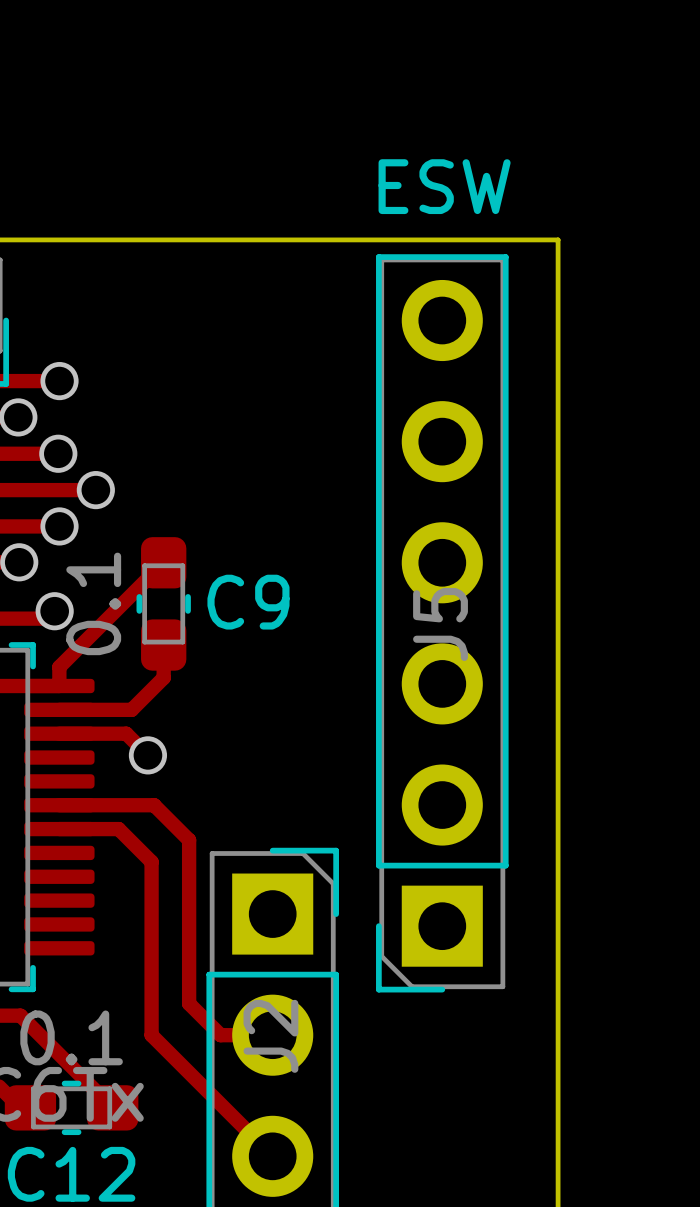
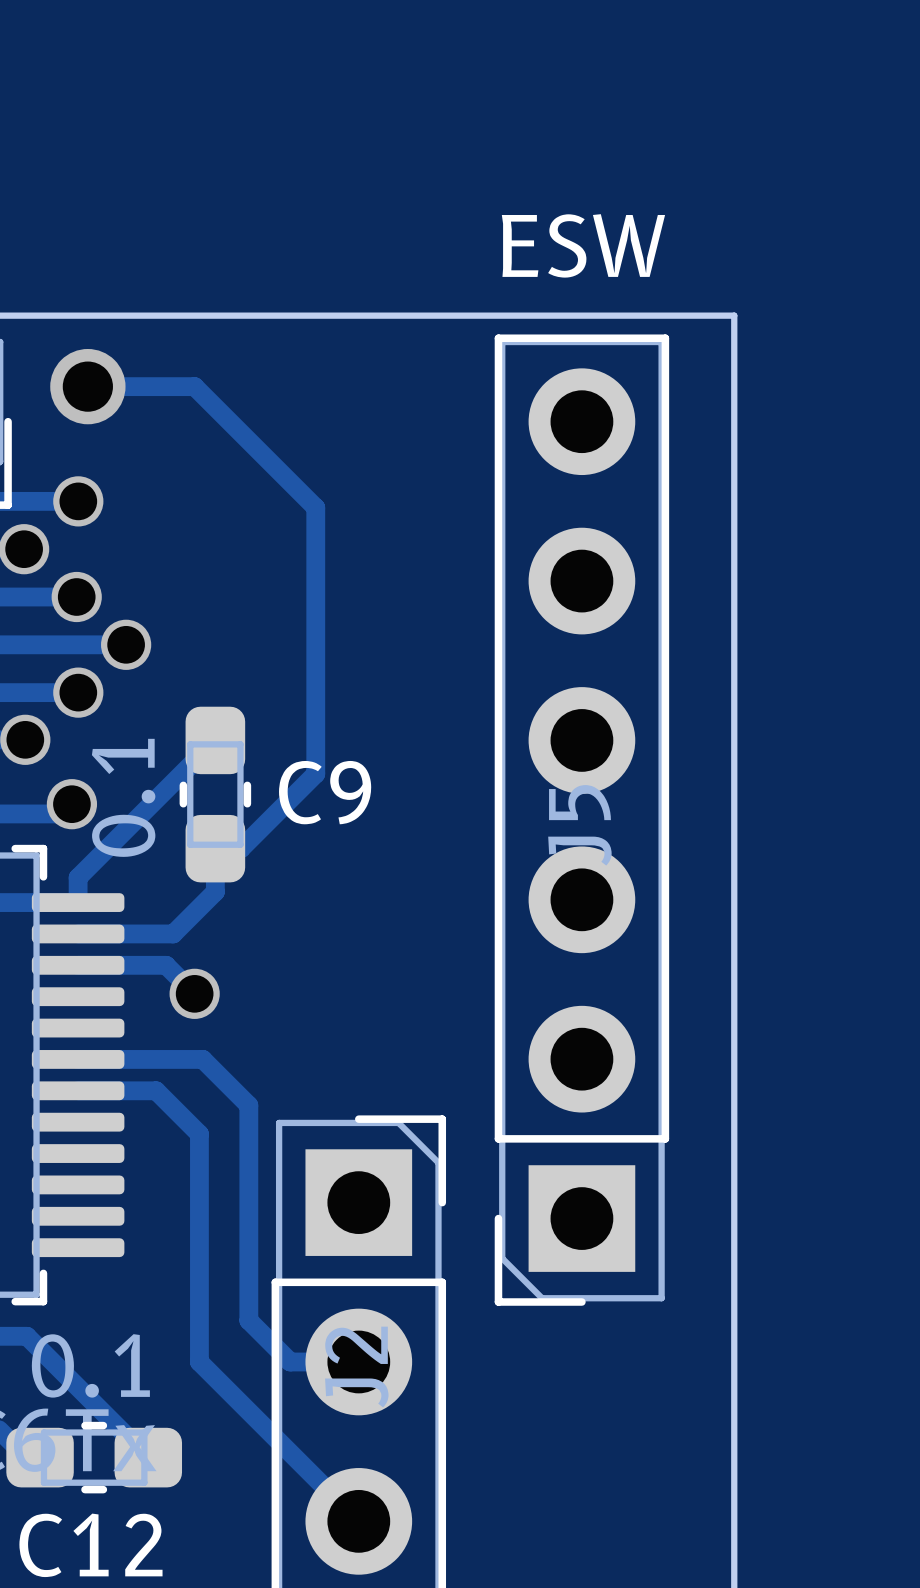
track: none -> (87, 386) (194, 386) (315, 507) (315, 773) (241, 848) (215, 848)
via: none -> (87, 386)

